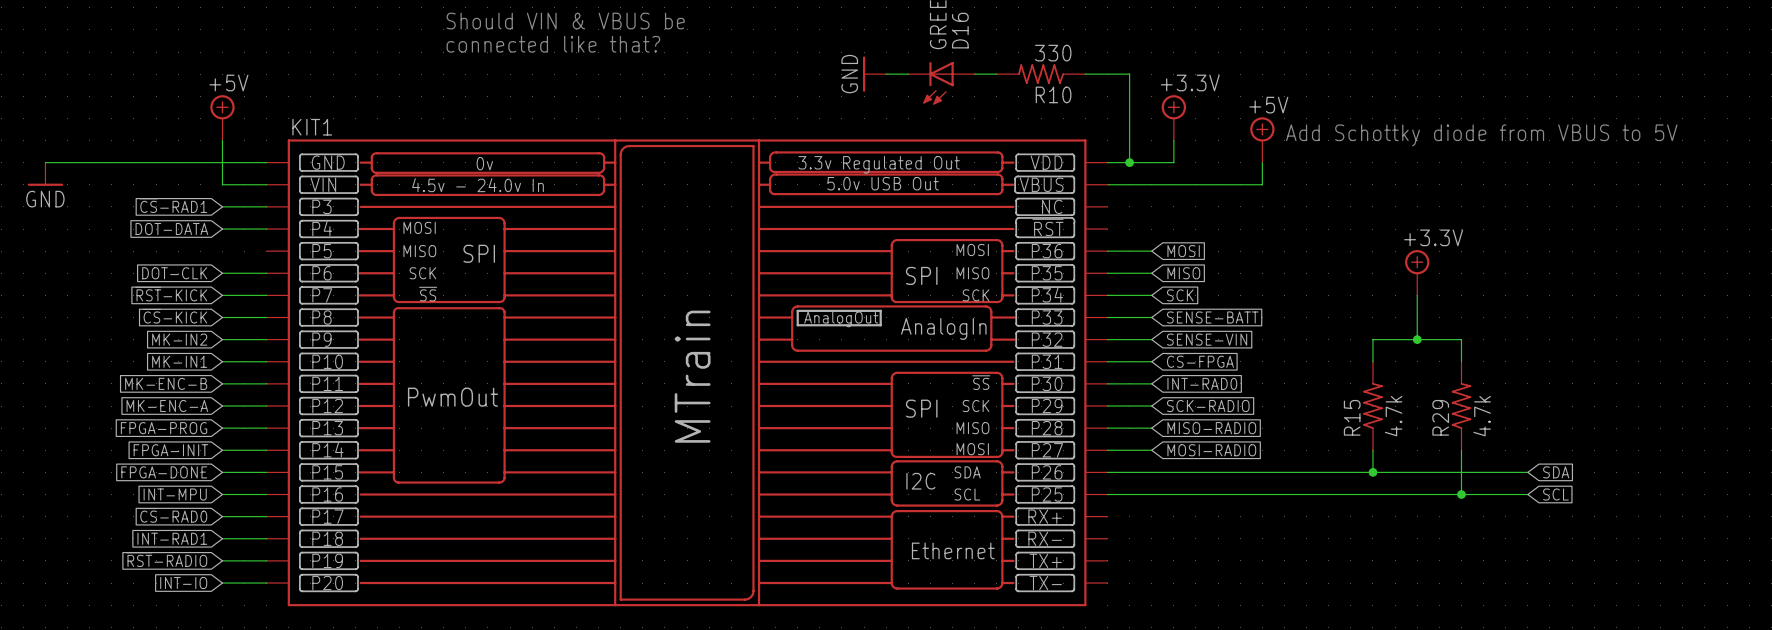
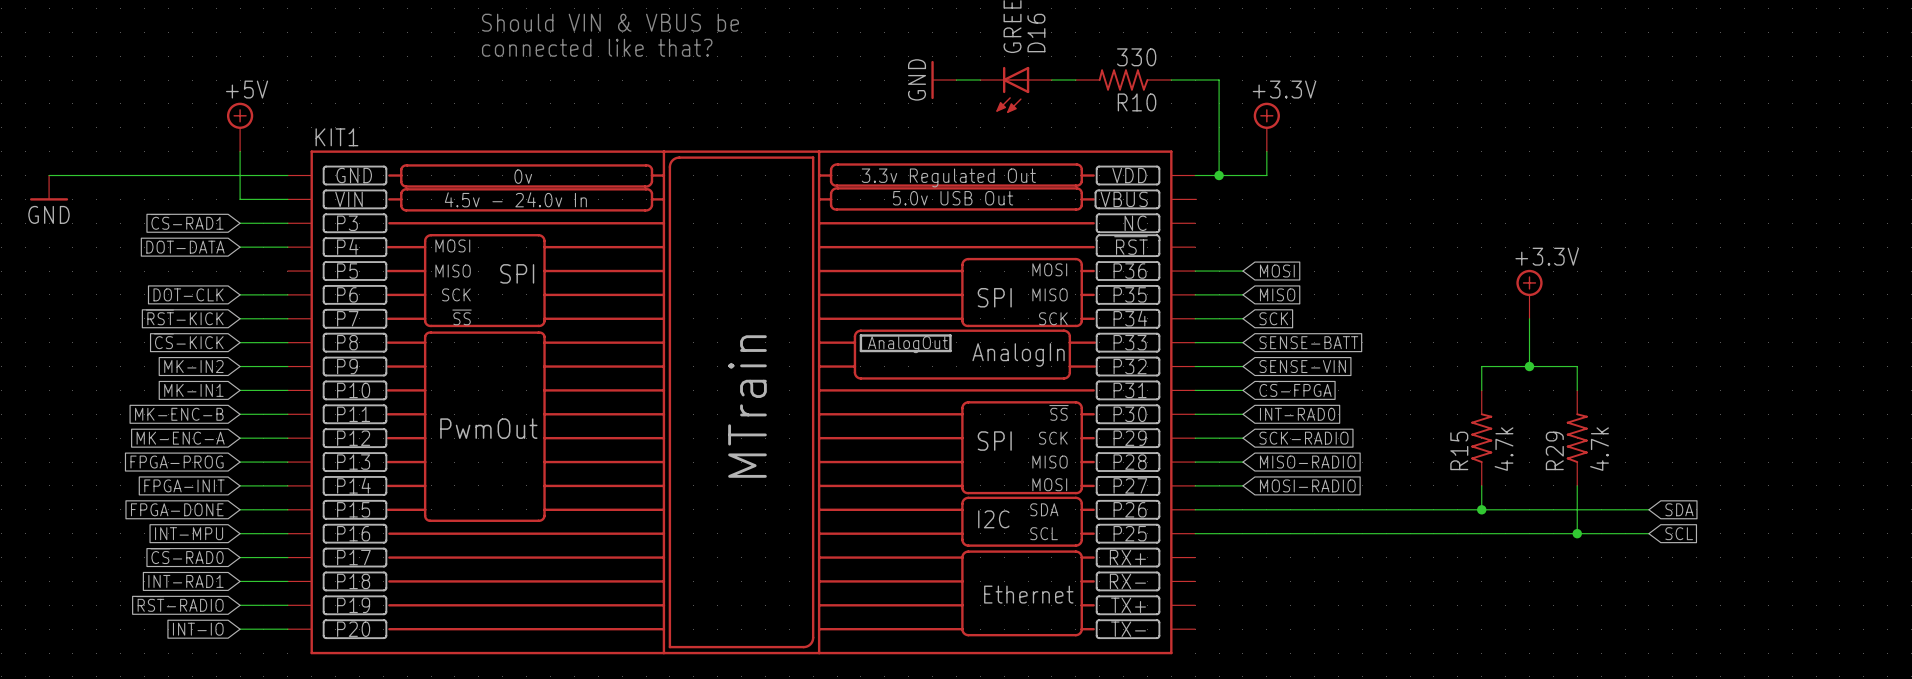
text: Add Schottky diode from VBUS to 5V (1481, 135) -> none
power symbol: +5V (1262, 139) -> none
wire: (1262, 162) (1262, 184) (1108, 184) -> none

